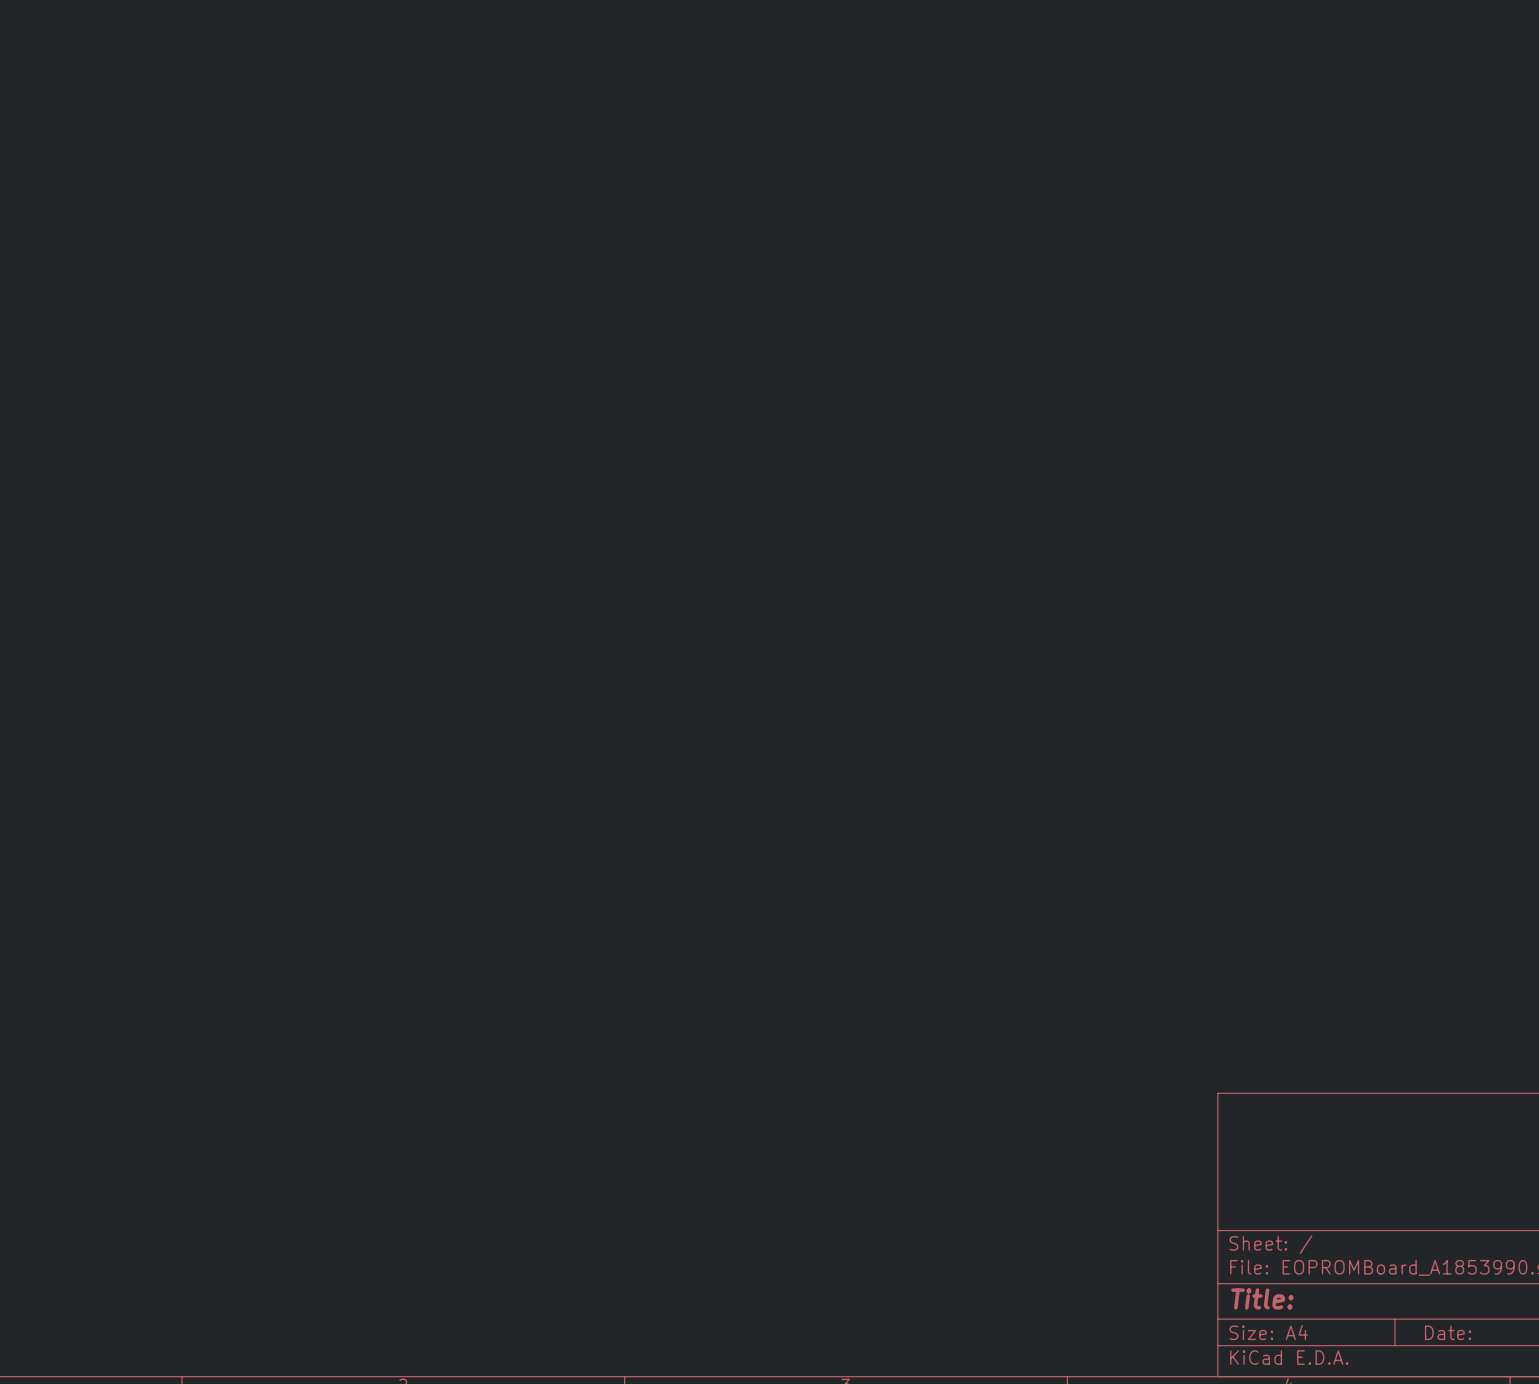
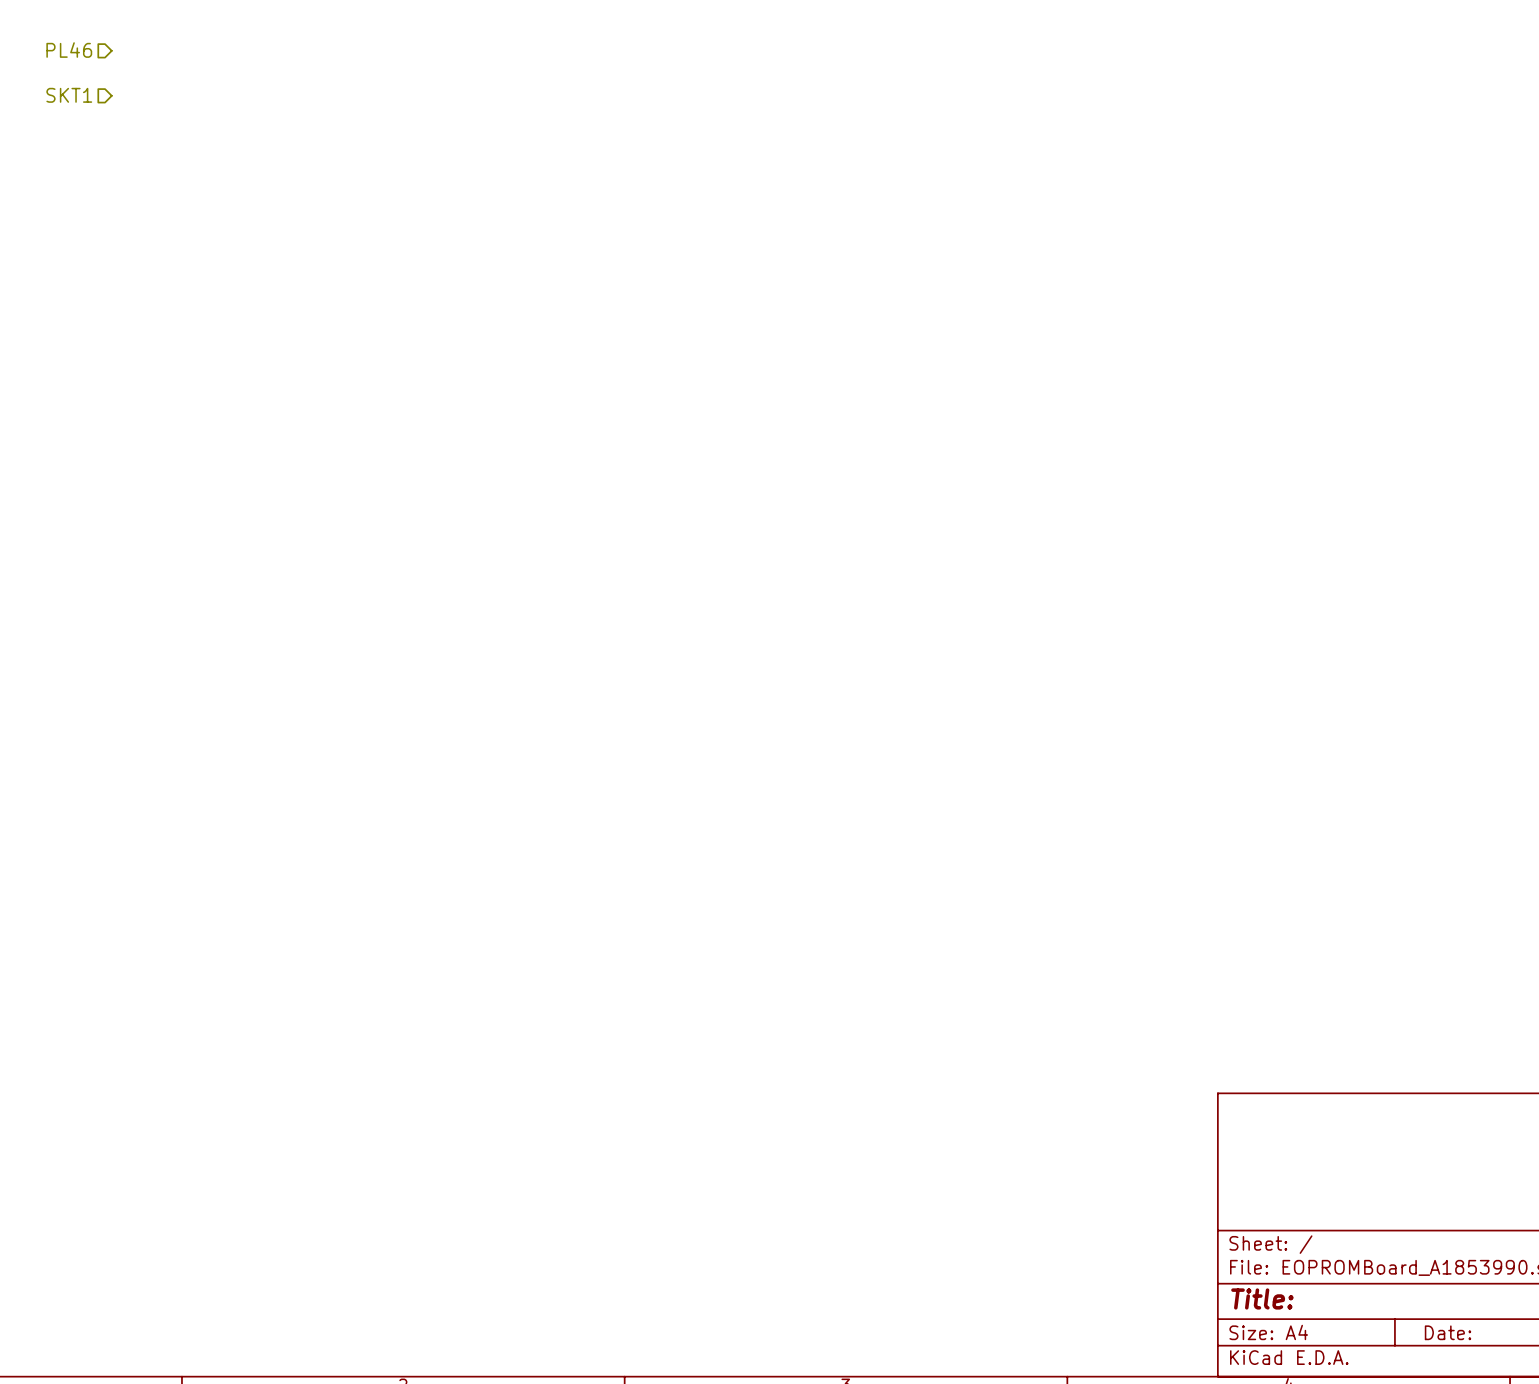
hierarchical label: none -> PL46 (69, 50)
hierarchical label: none -> SKT1 (69, 95)

